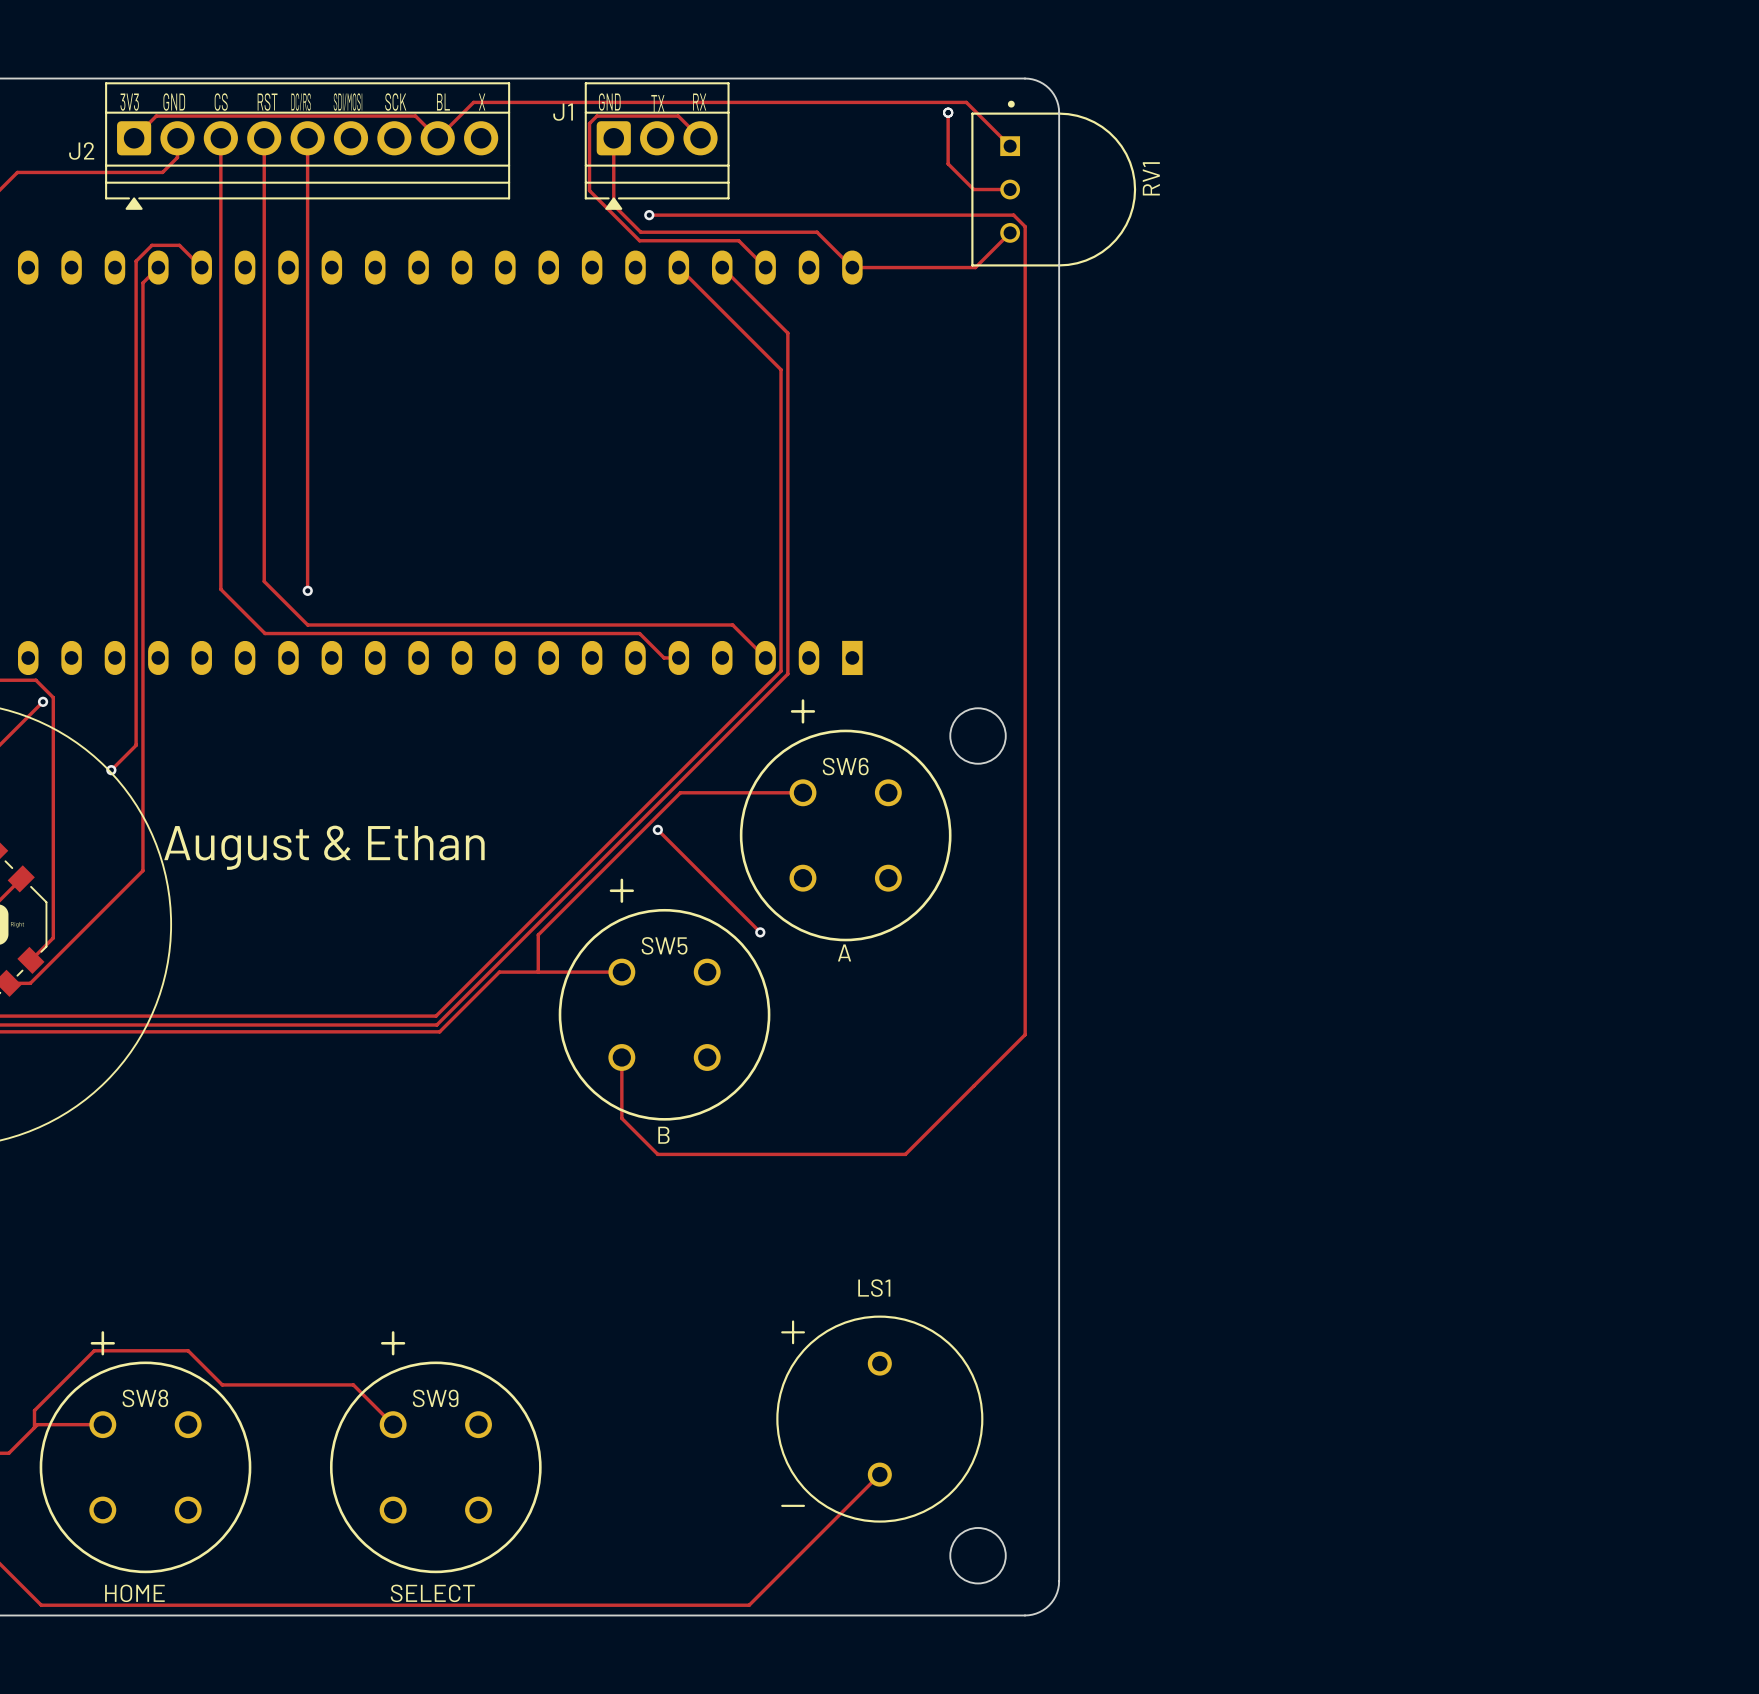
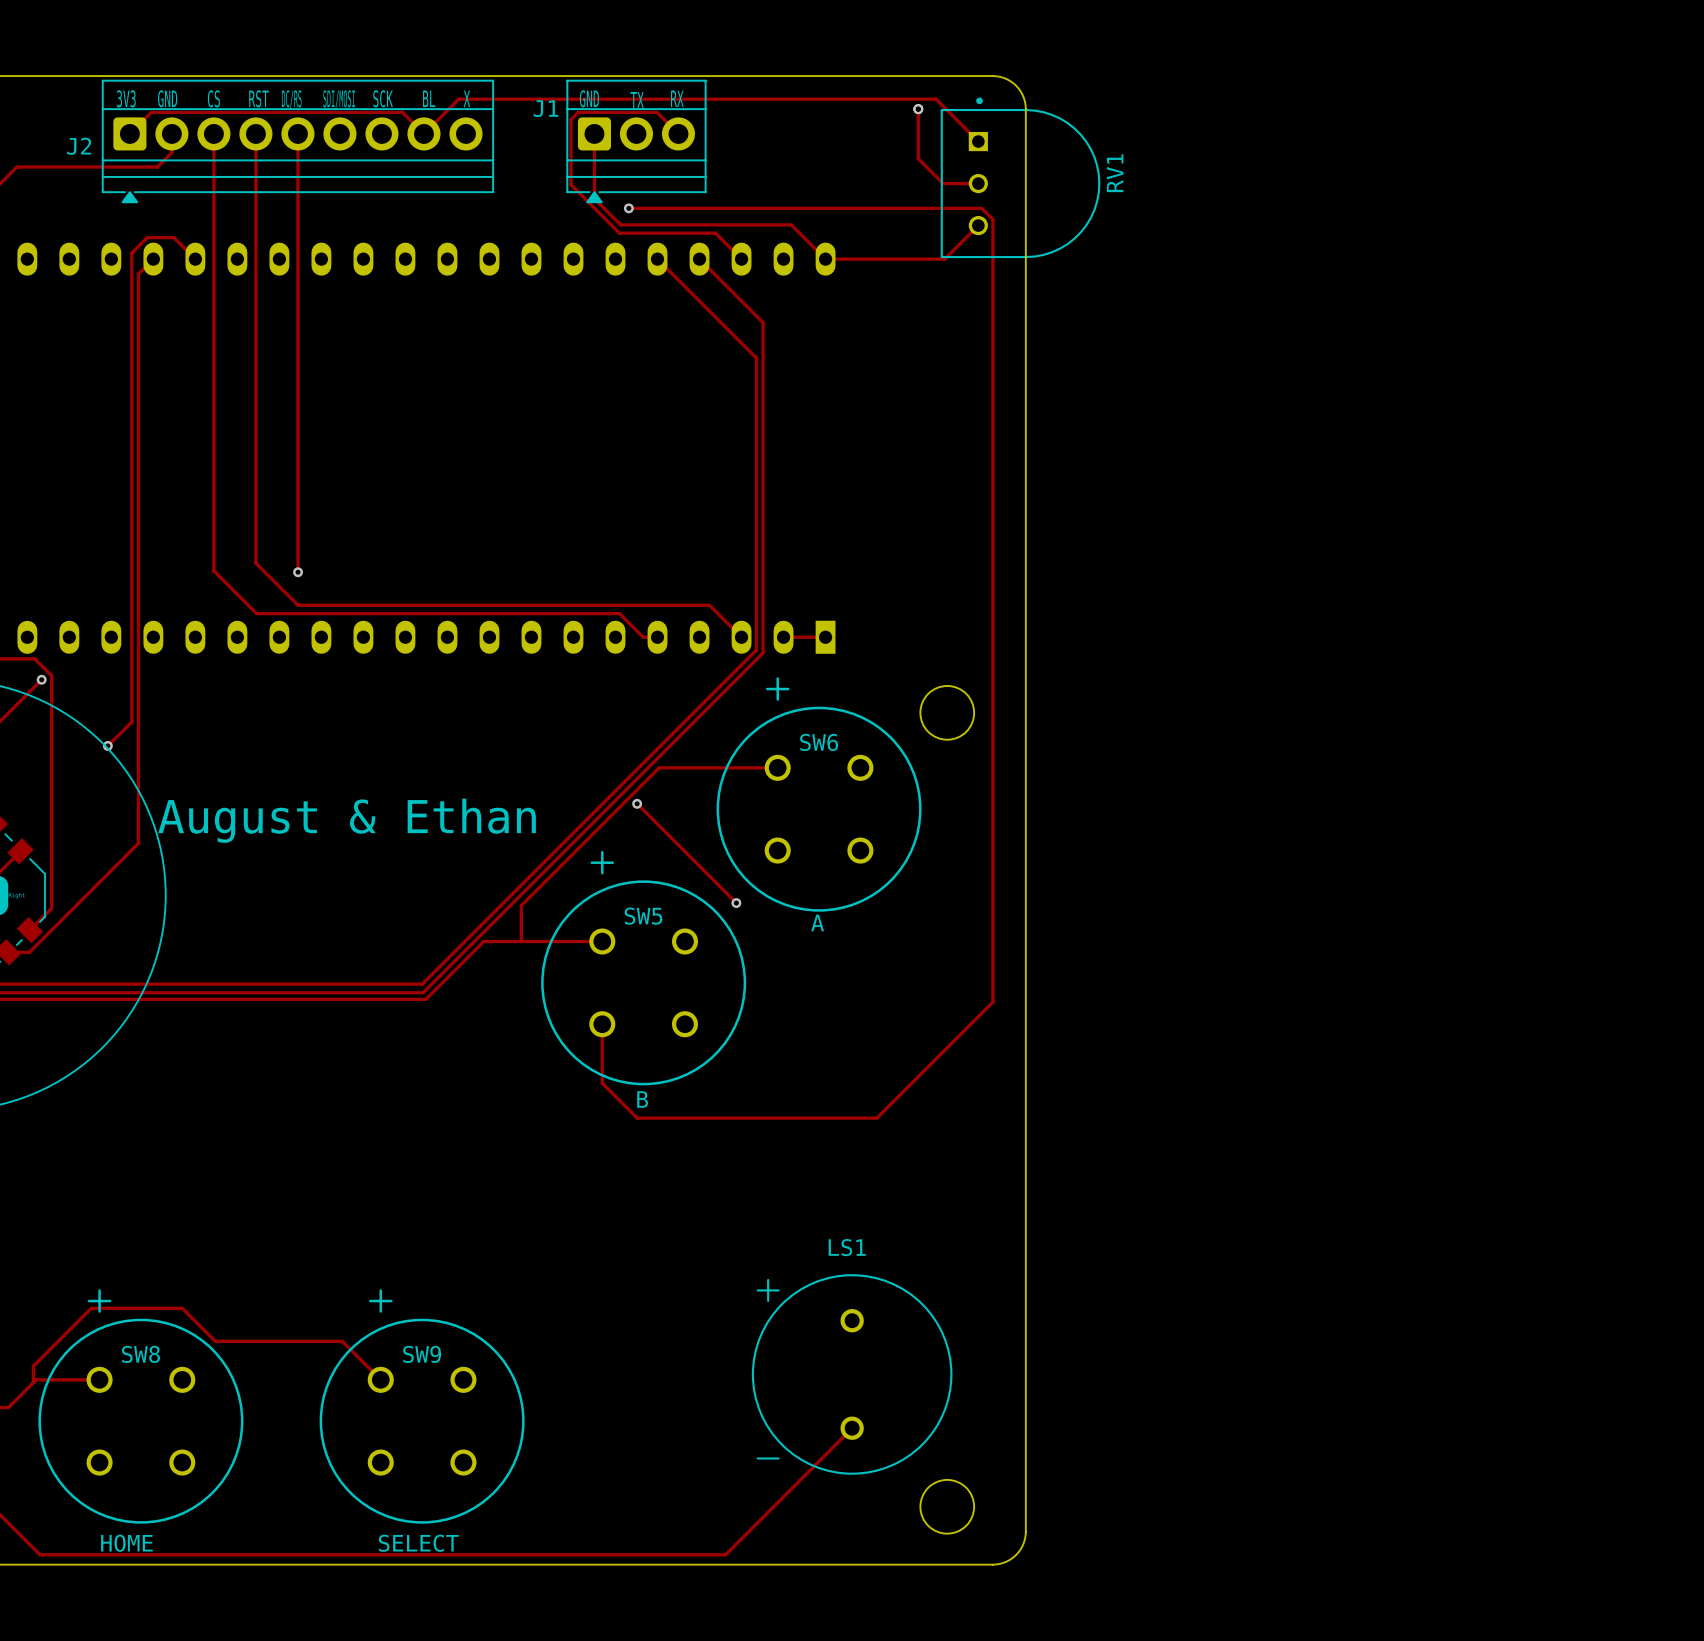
track: none -> (783, 637) (825, 637)

